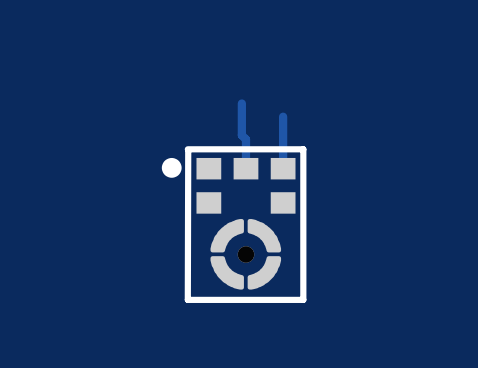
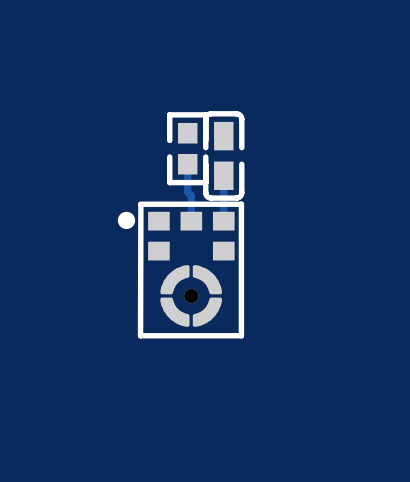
part: none -> (187, 148)
part: none -> (223, 155)

